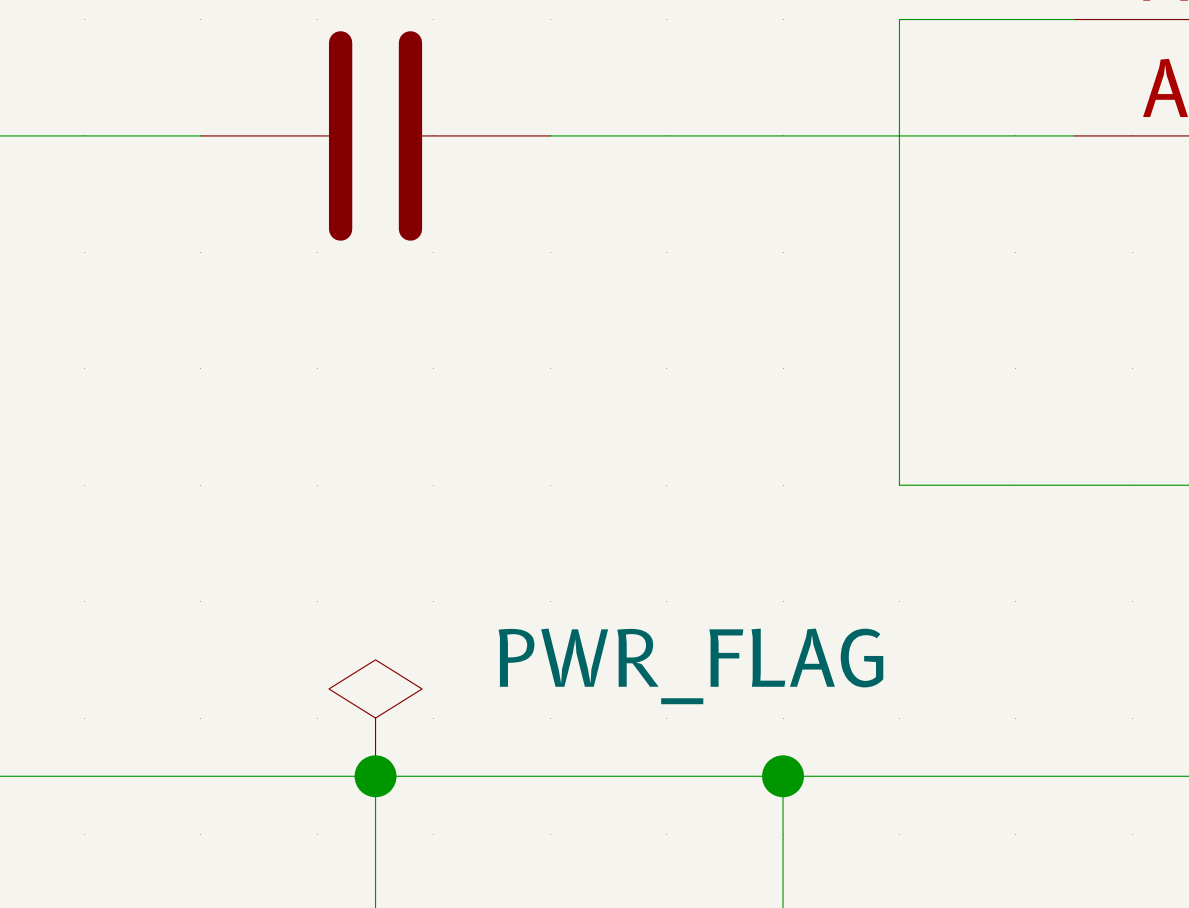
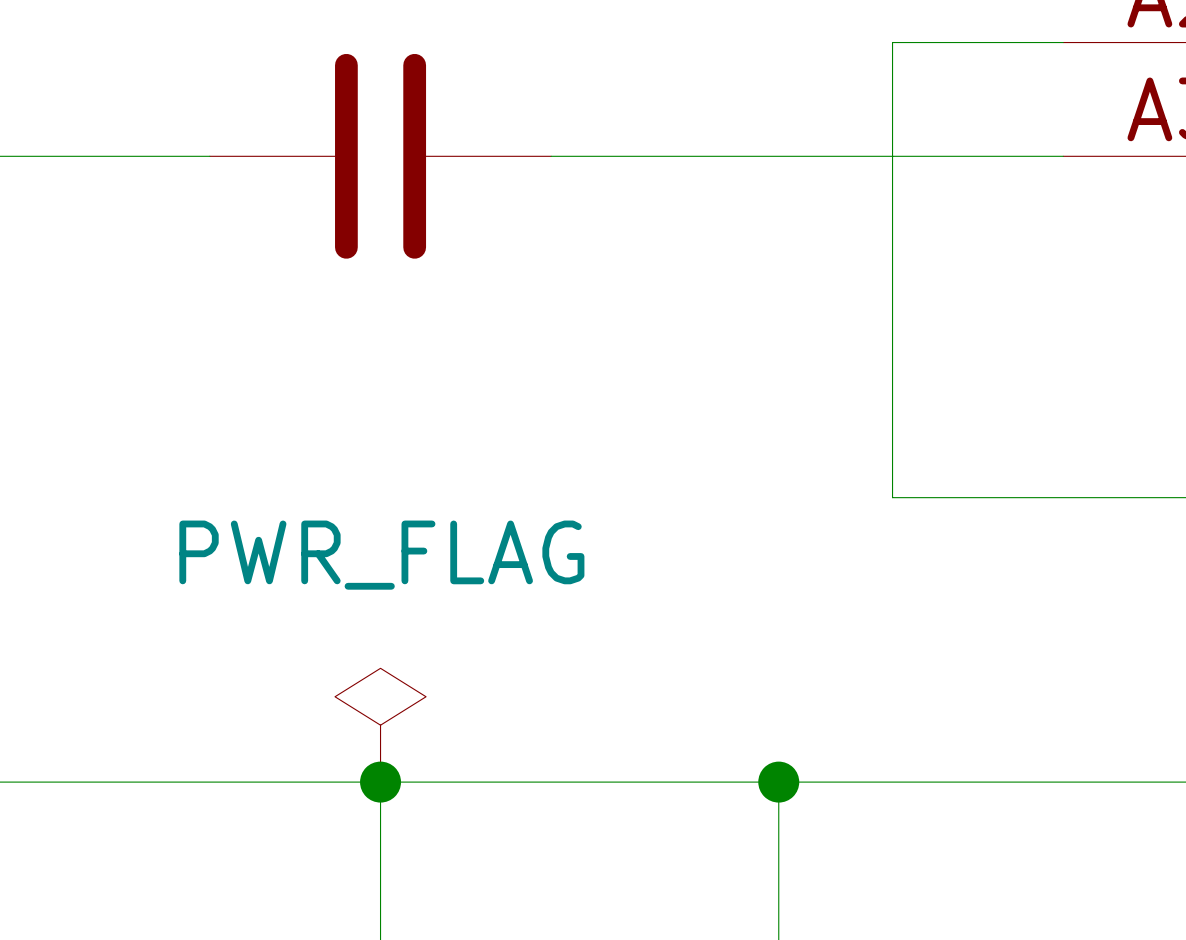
power symbol text position: PWR_FLAG (690, 666) -> PWR_FLAG (381, 555)

